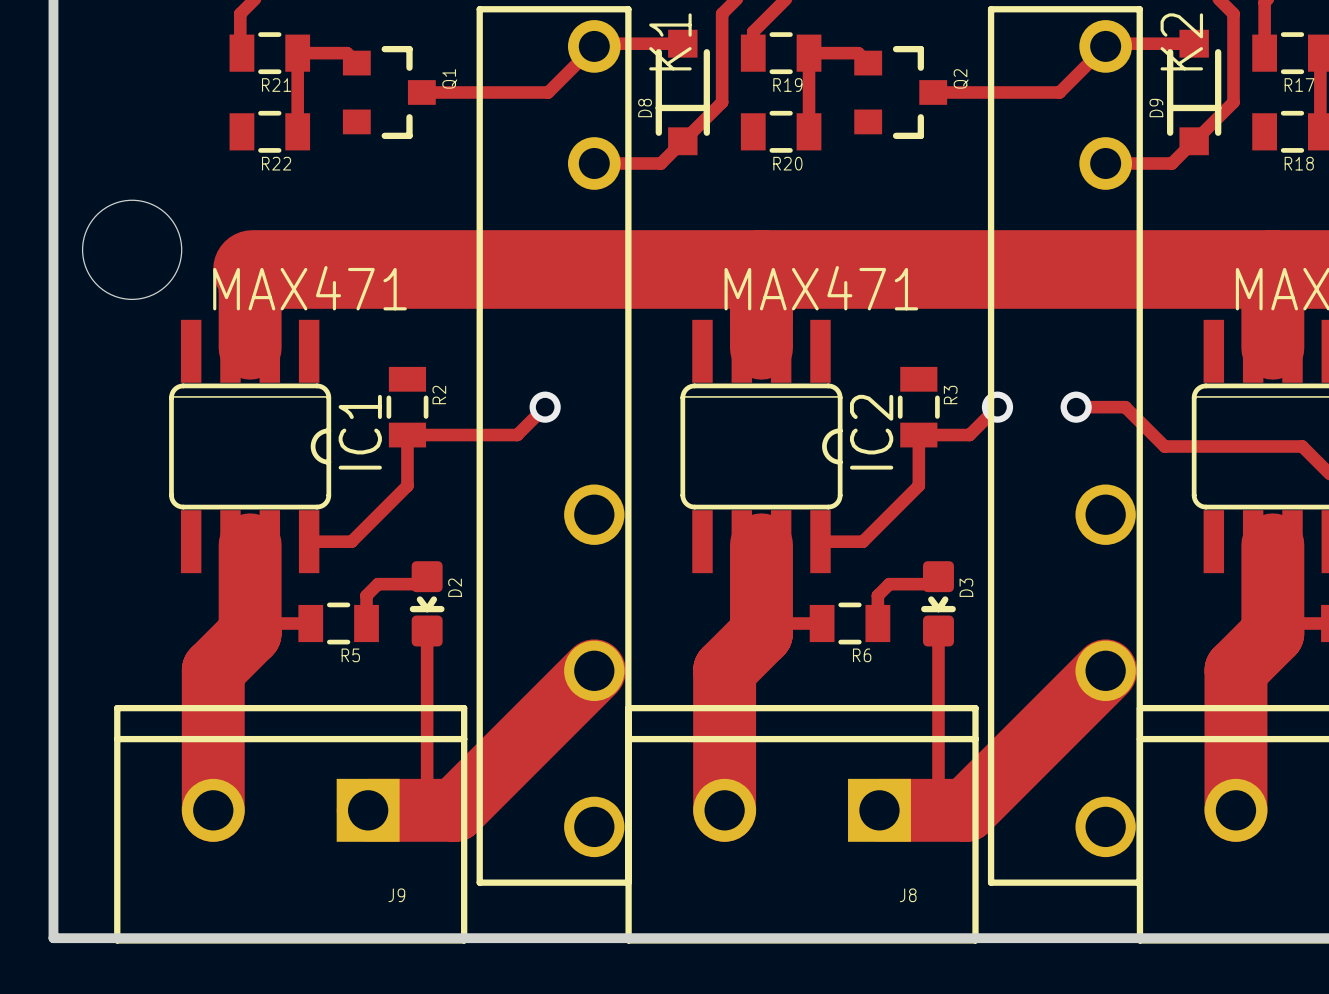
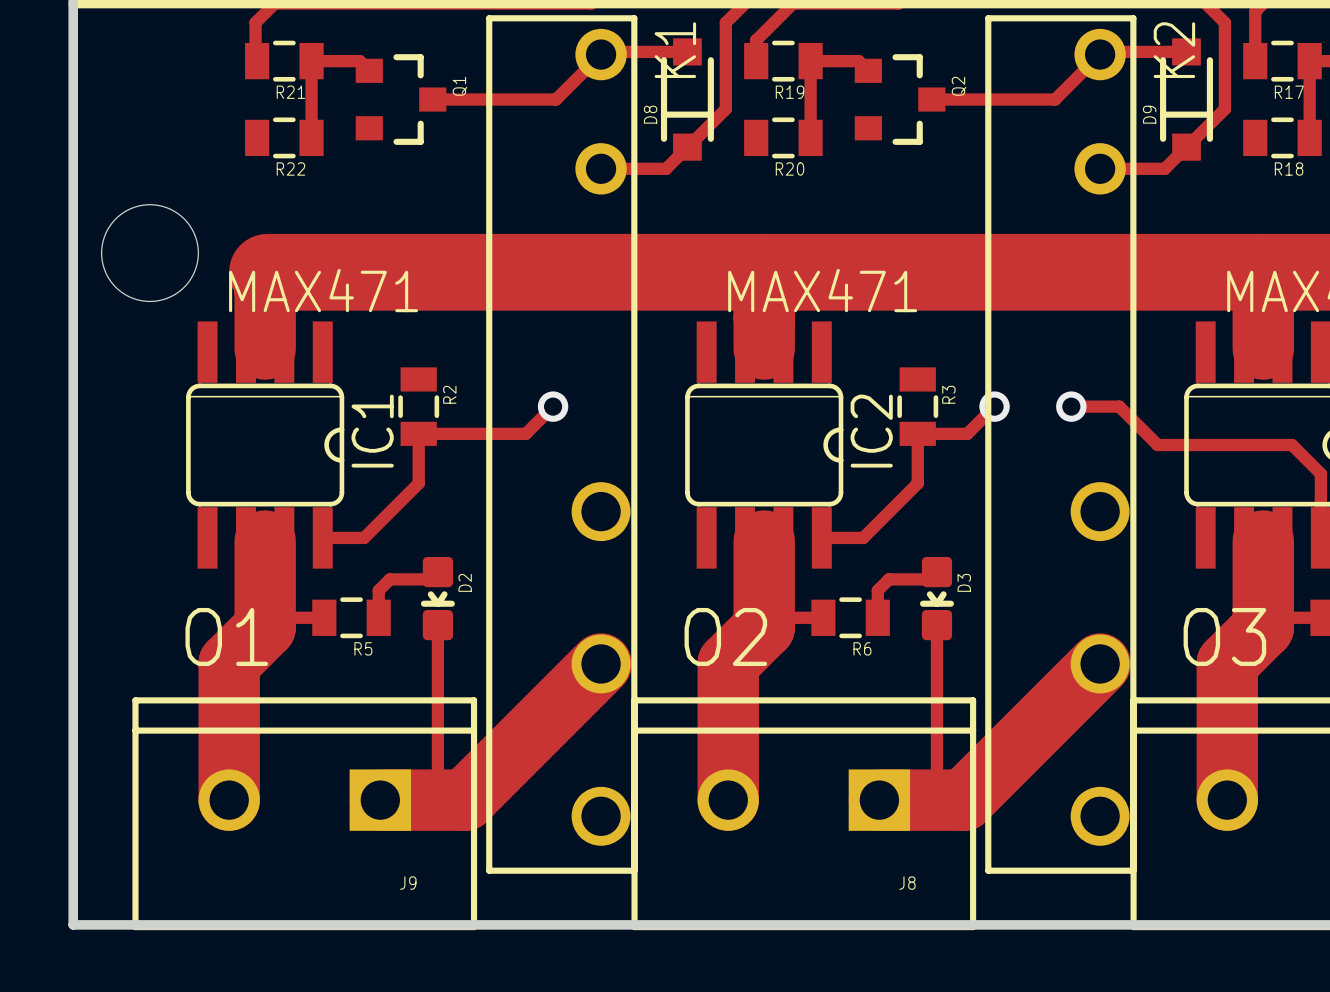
text: none -> O1 (226, 636)
text: none -> O2 (725, 636)
text: none -> O3 (1224, 636)

